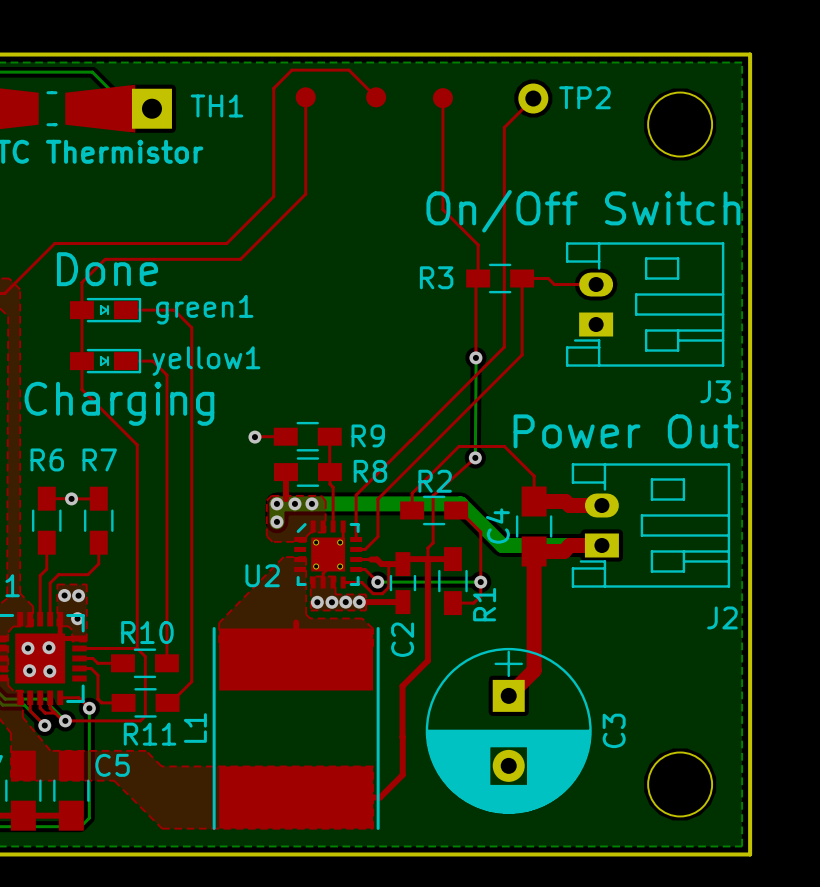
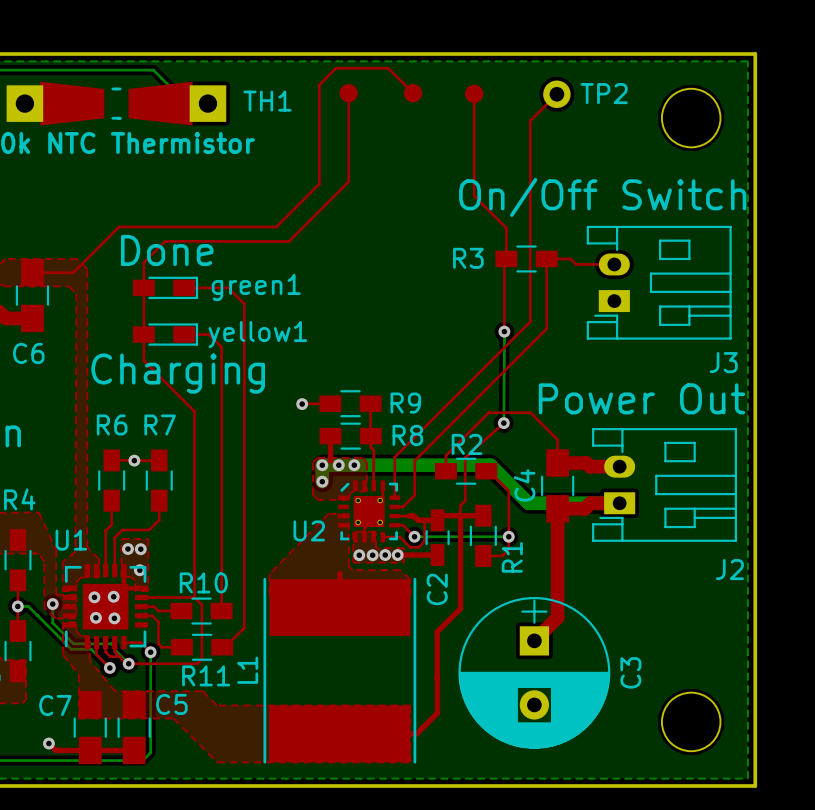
green1 footprint: [69, 297, 142, 323] -> [132, 276, 199, 300]
yellow1 footprint: [69, 348, 142, 374] -> [132, 323, 199, 346]

